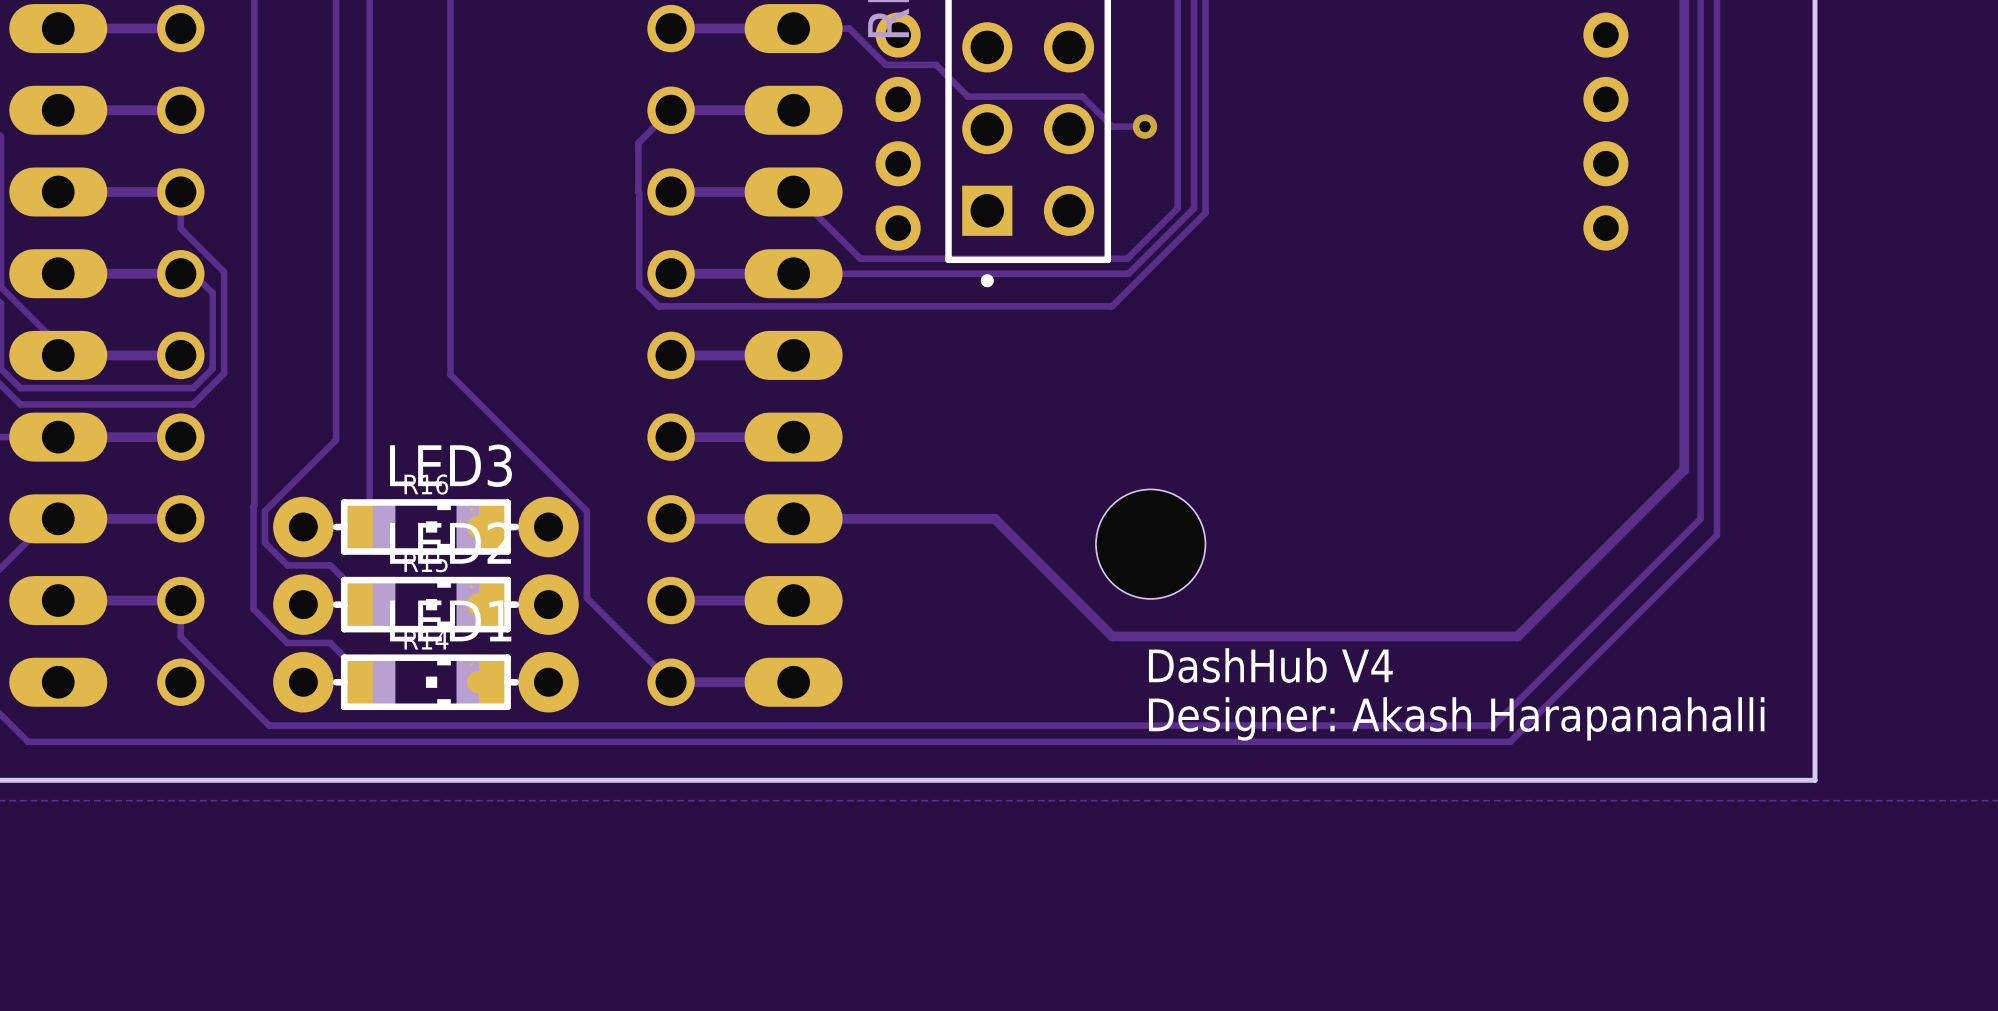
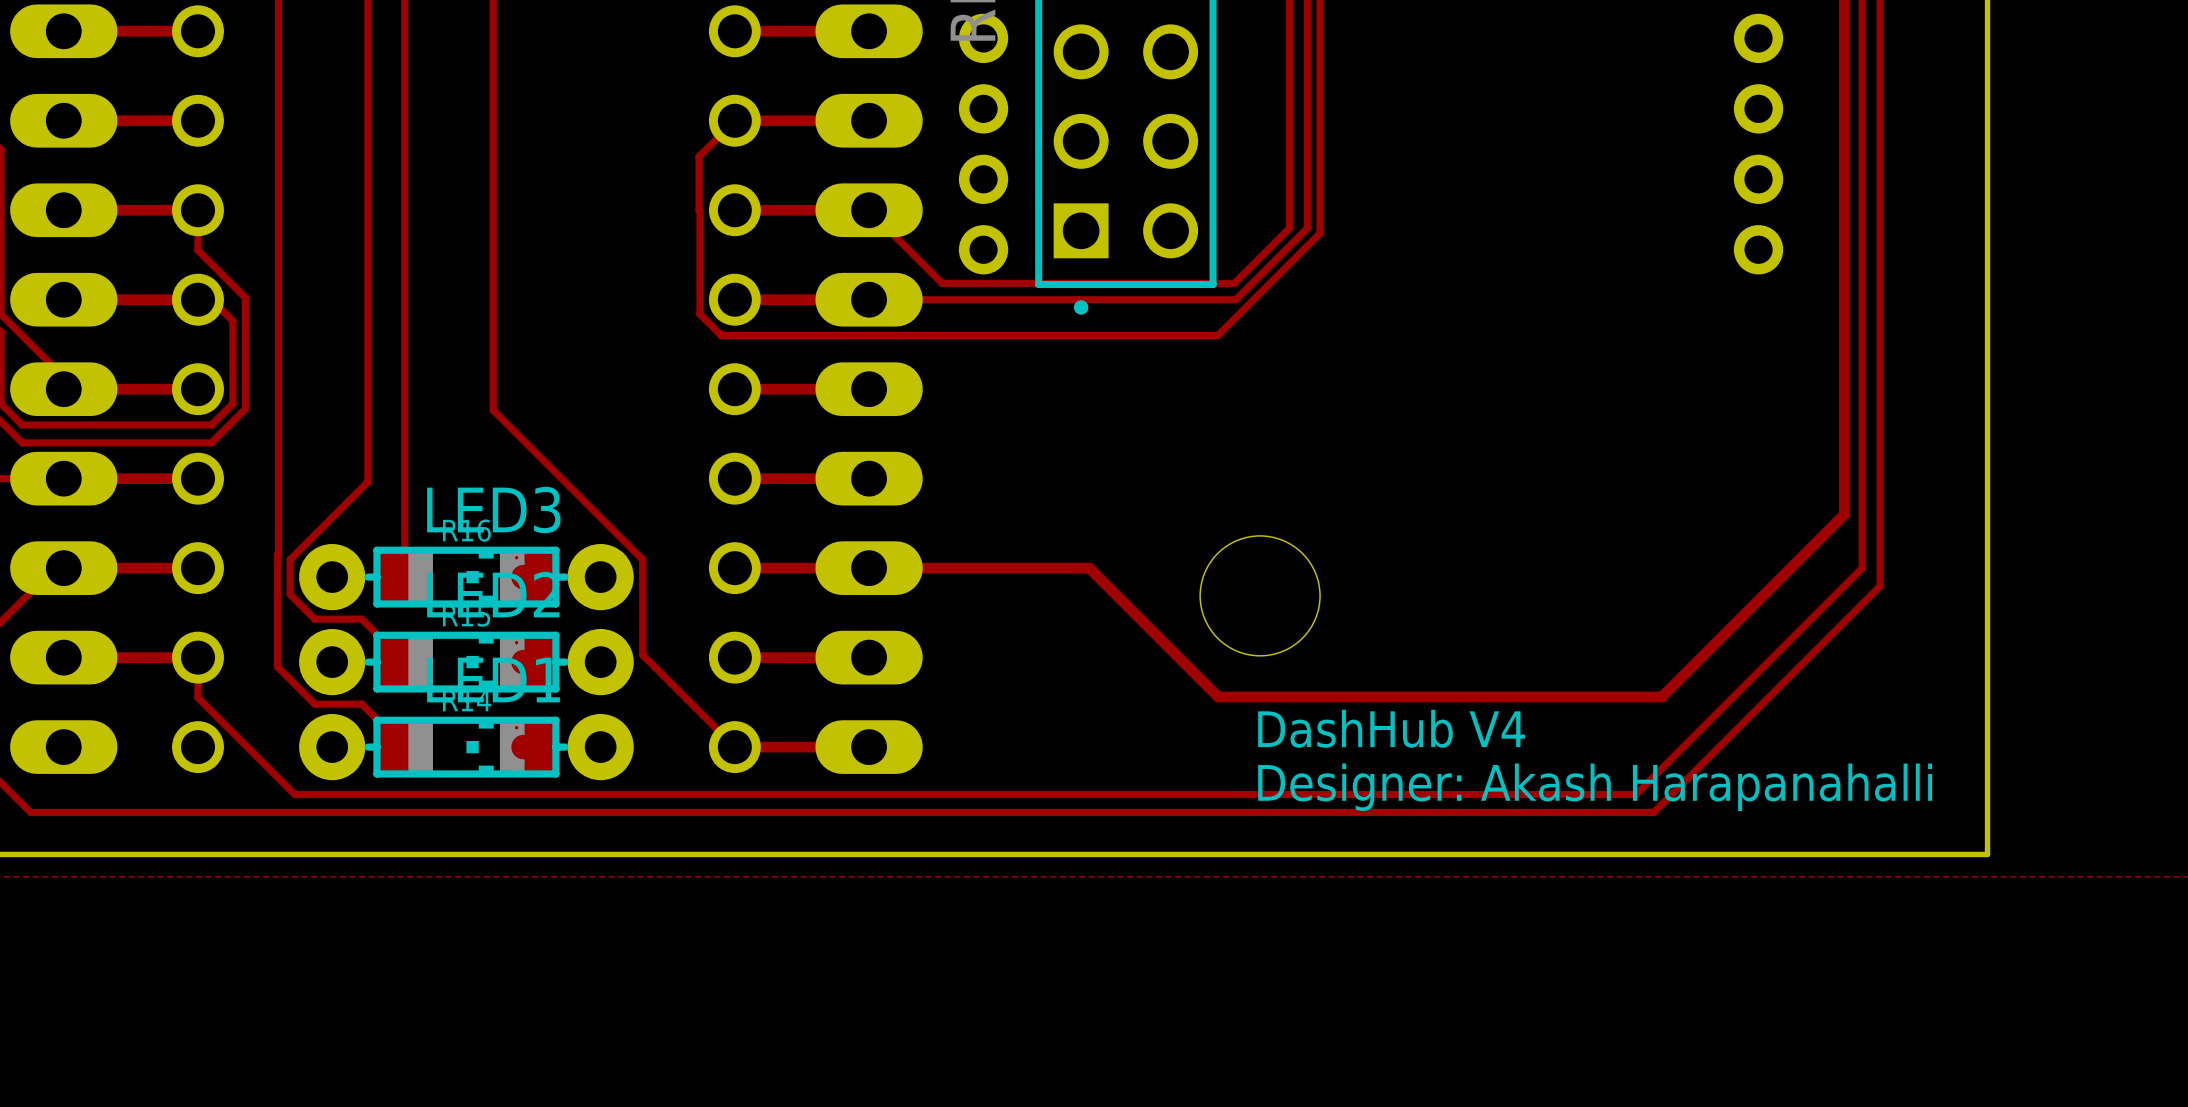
track: (793, 28) (849, 28) (885, 64) (936, 64) (967, 96) (1082, 96) (1112, 126) (1144, 126) -> none
via: (1144, 126) -> none

